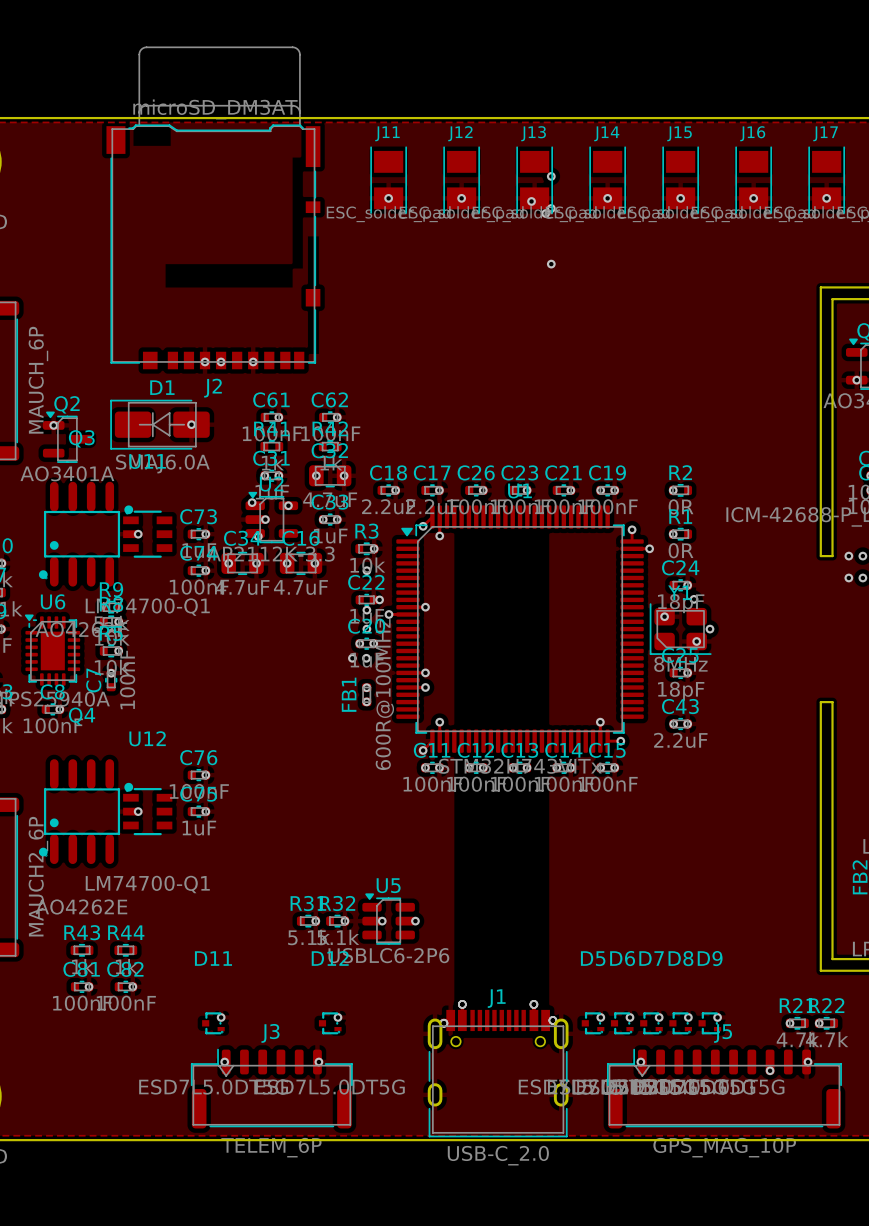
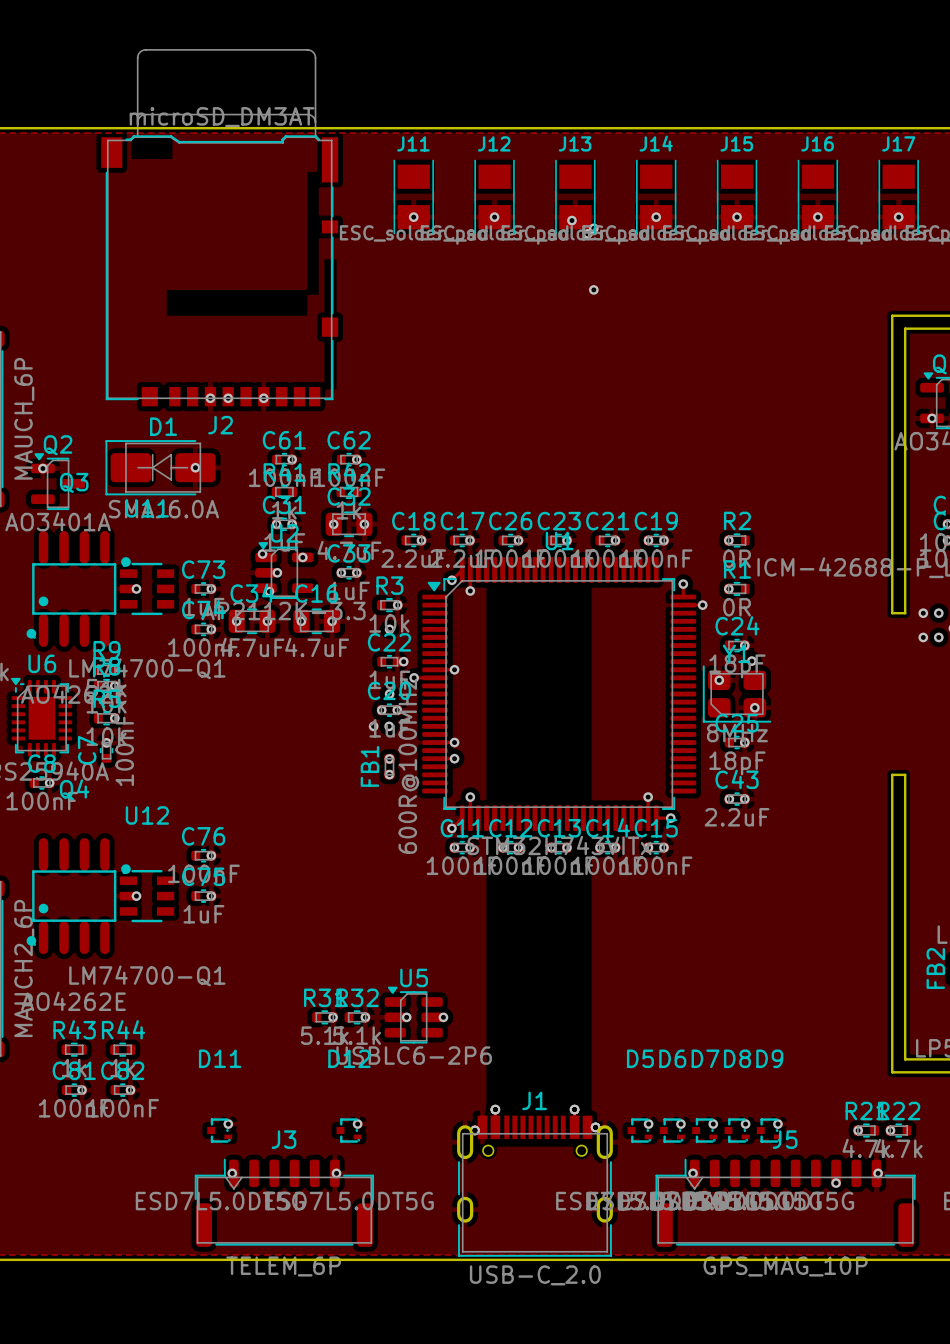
via: (551, 176) -> none
via: (366, 610) -> none
via: (710, 629) -> none

